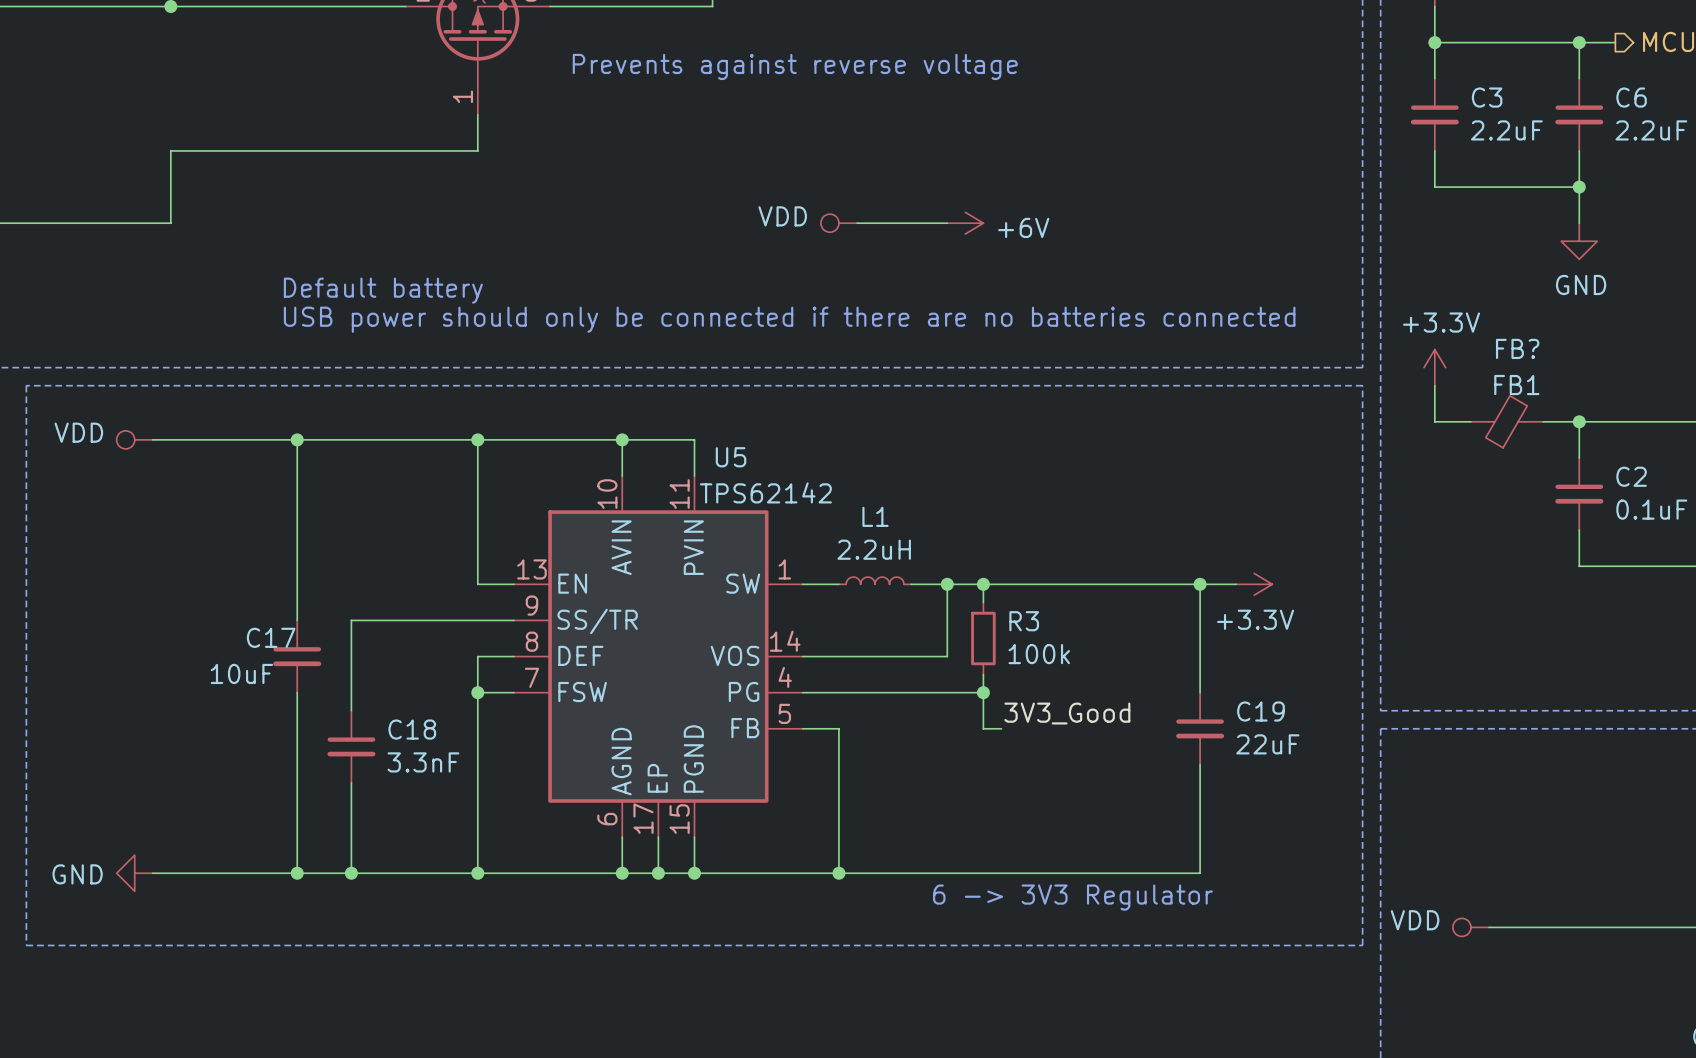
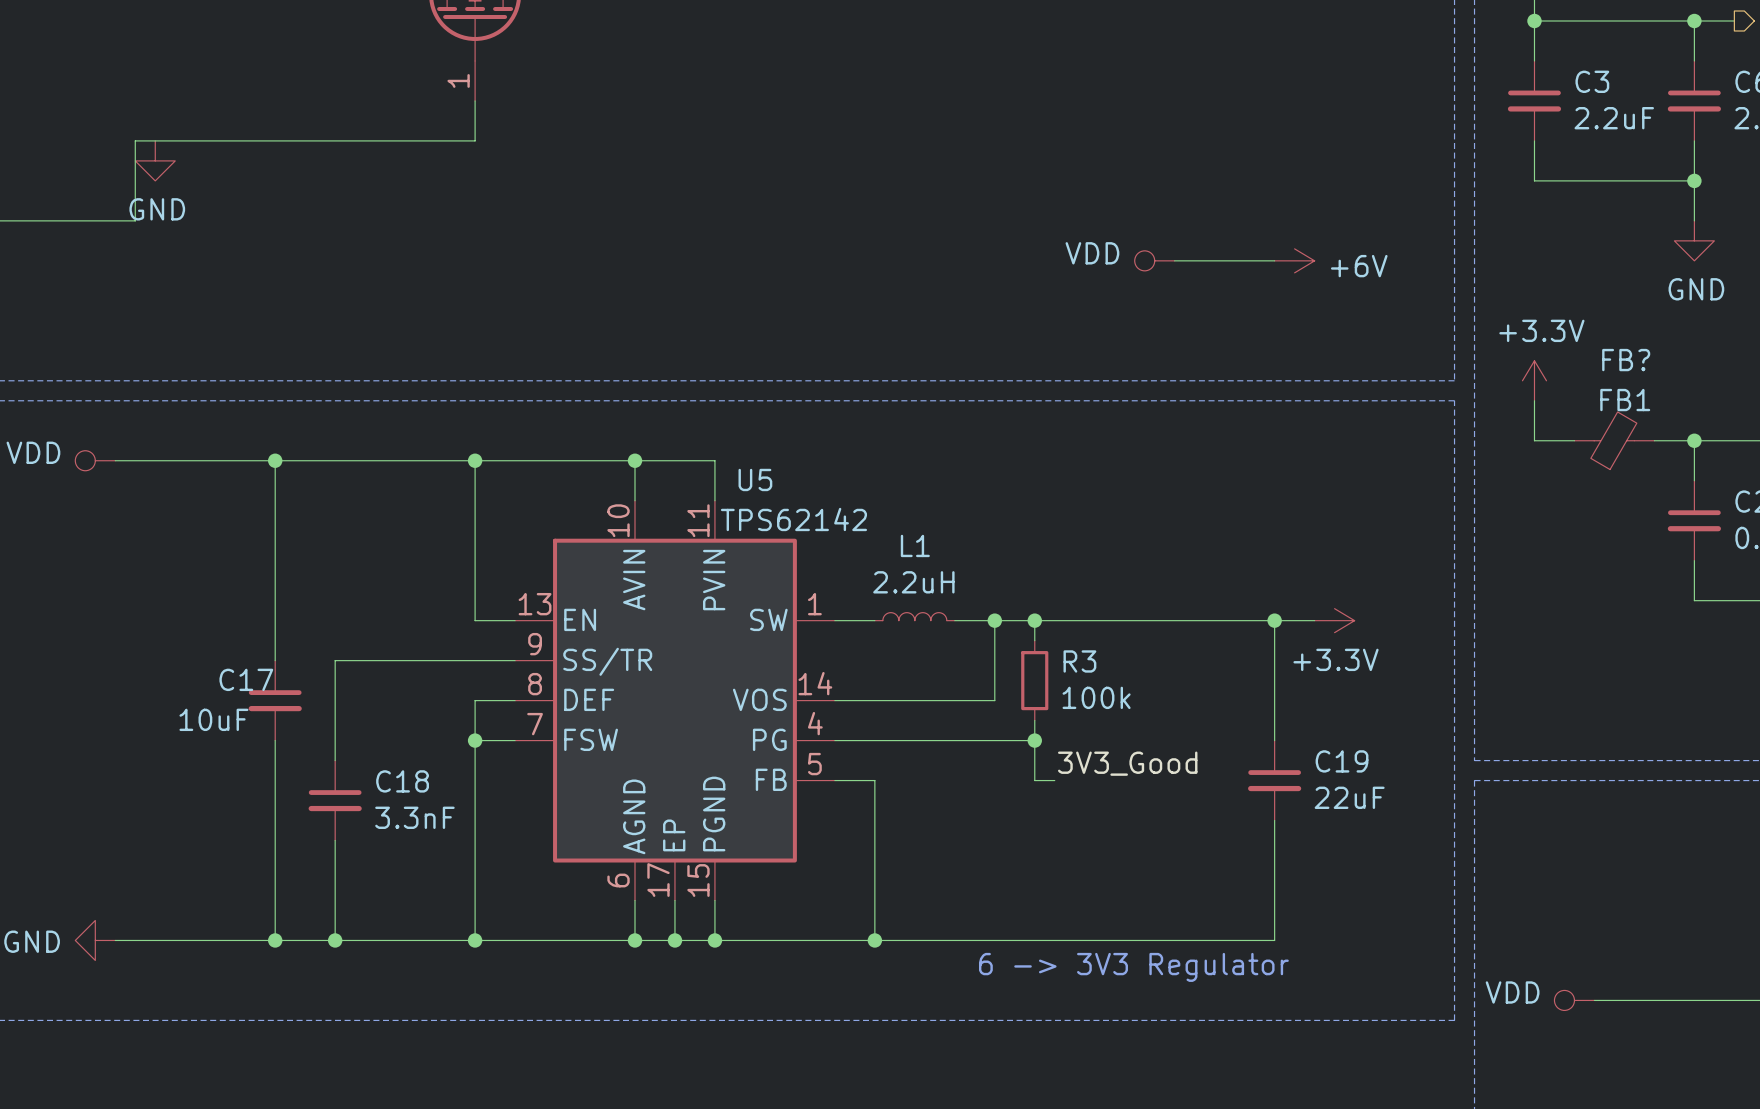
text: Prevents against reverse voltage (795, 66) -> none
power symbol: none -> GND (155, 160)
power symbol: VDD (838, 223) -> none
wire: (857, 223) (947, 223) -> (1174, 260) (1274, 260)
power symbol position: +6V (965, 223) -> +6V (1294, 260)
power symbol: none -> VDD (1154, 260)
text: Default battery (383, 290) -> none
text: USB power should only be connected if there are no batteries connected (789, 319) -> none

